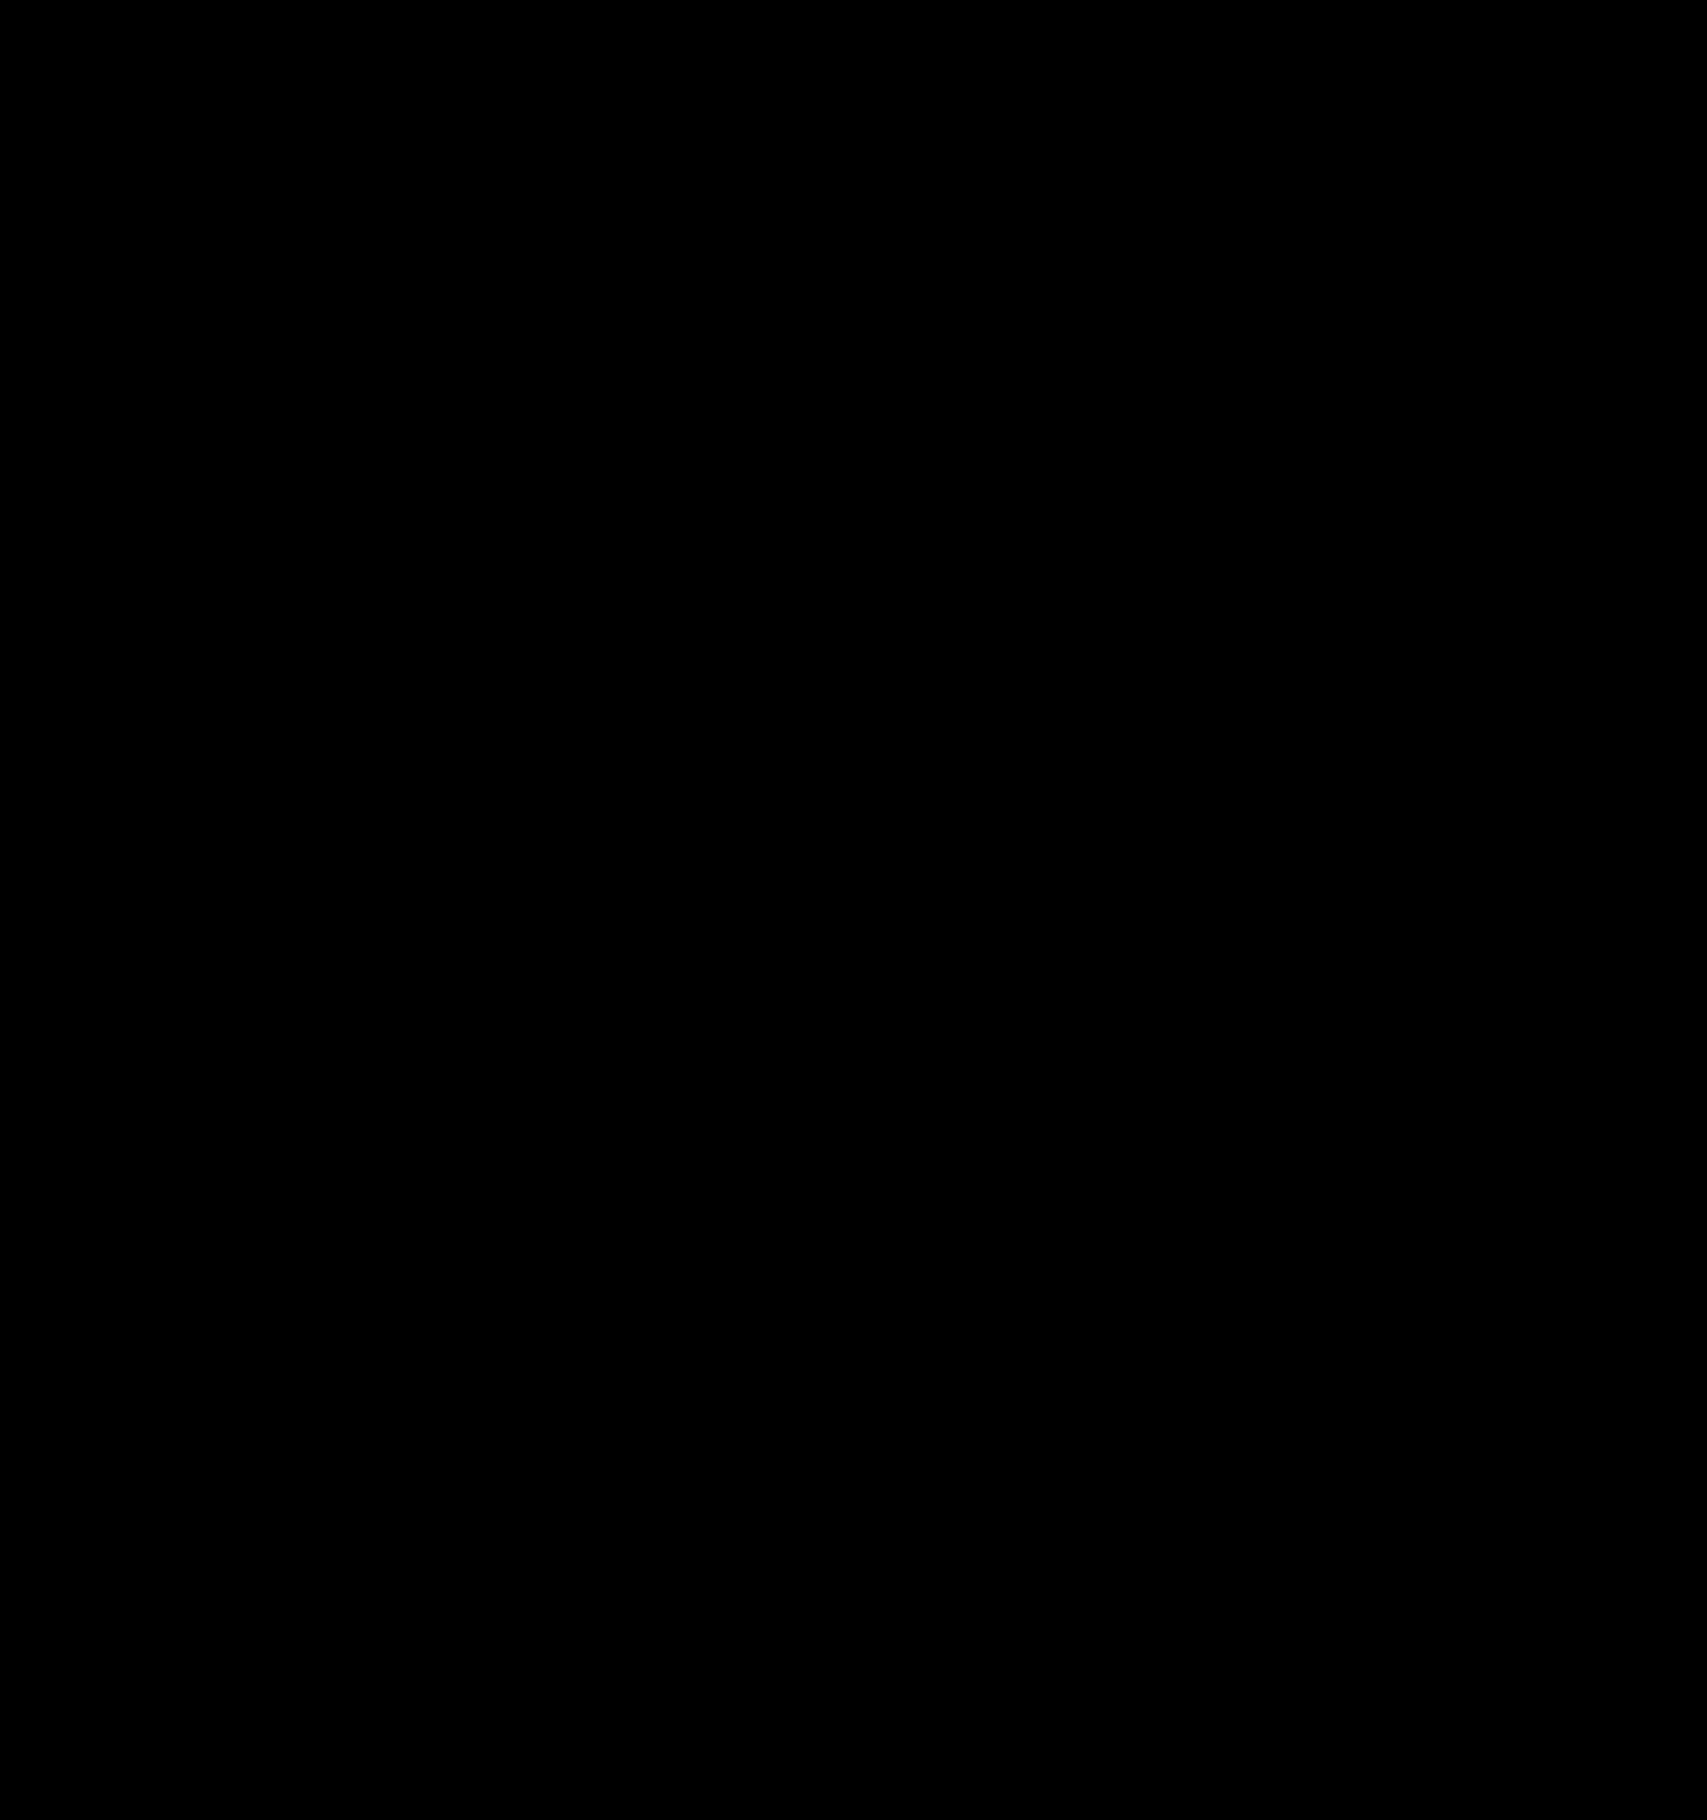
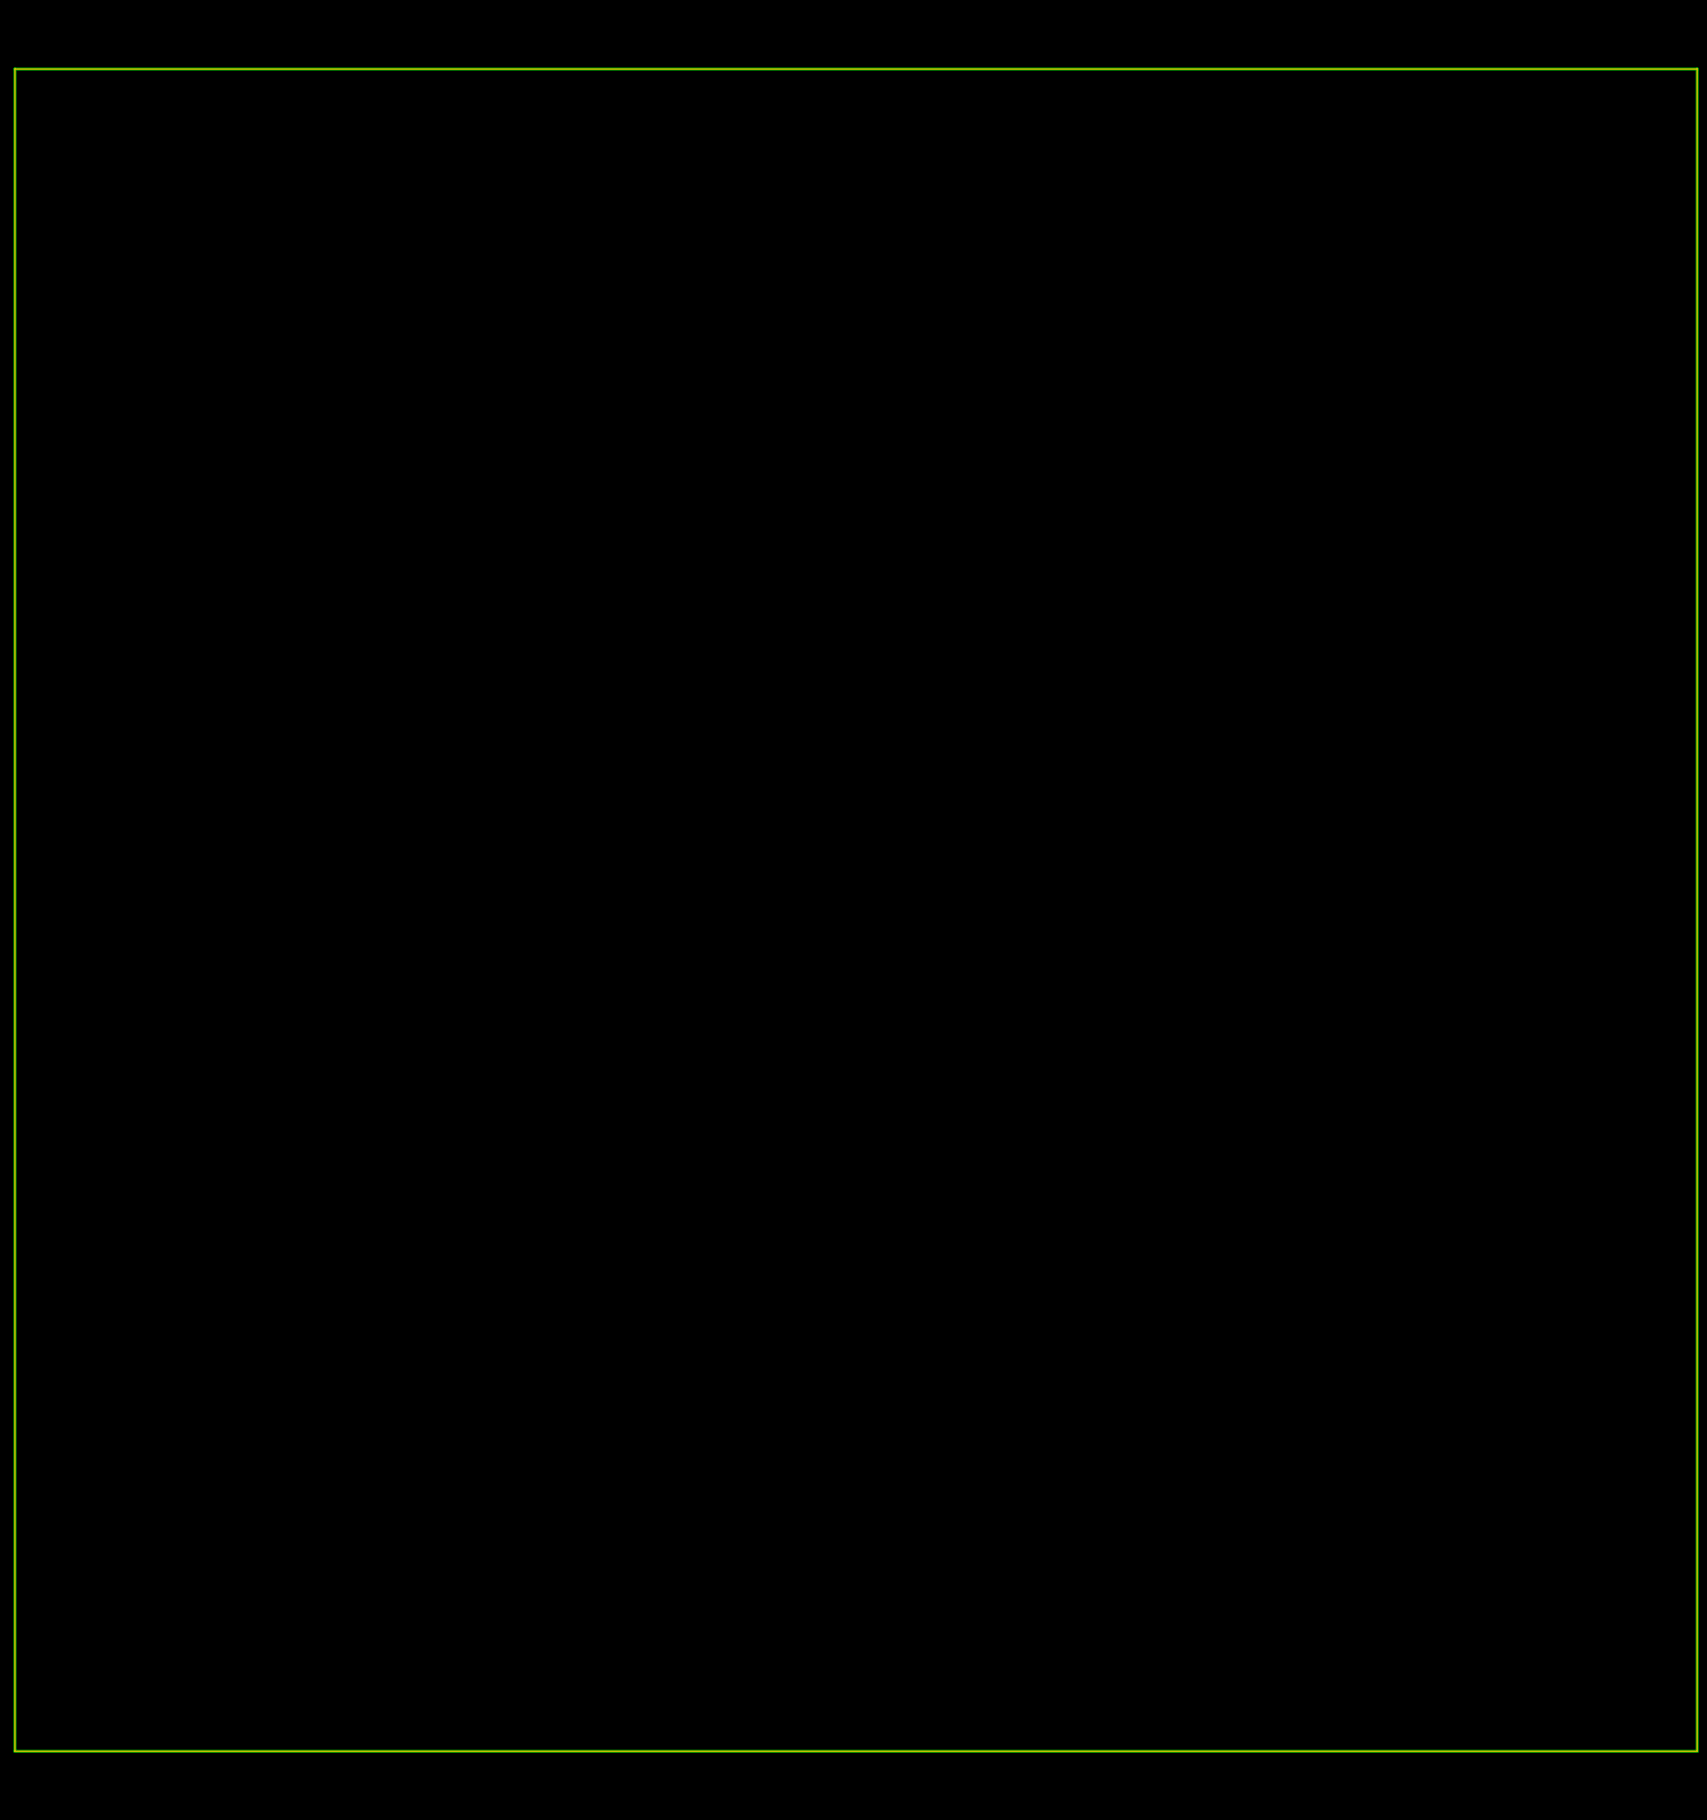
track: none -> (1697, 69) (14, 69) (14, 1751) (1697, 1751) (1697, 69)
board edge: none -> (1697, 69) (14, 69) (14, 1751) (1697, 1751) (1697, 69)

